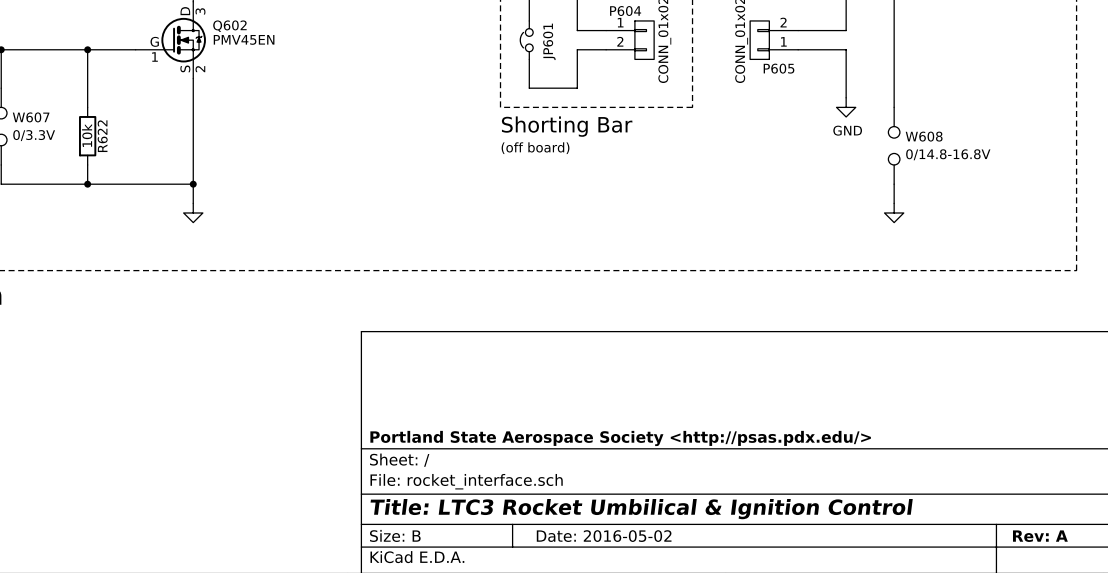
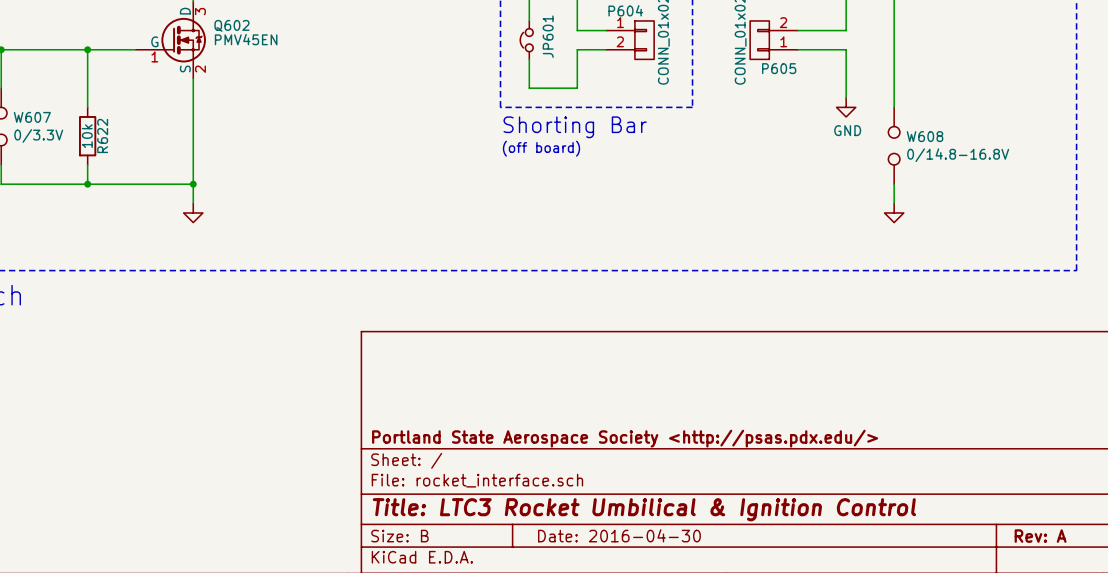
title block: Date: 2016-05-02 (604, 536) -> Date: 2016-04-30 (619, 535)

